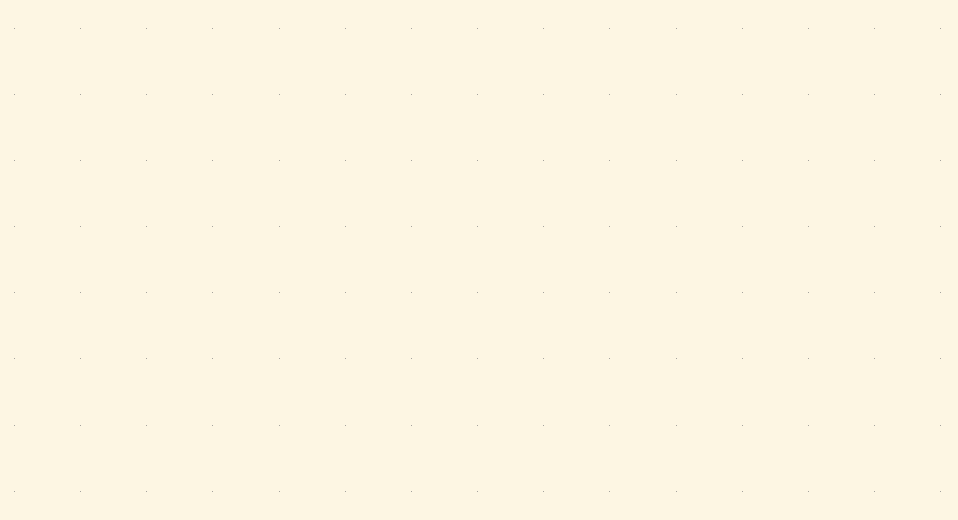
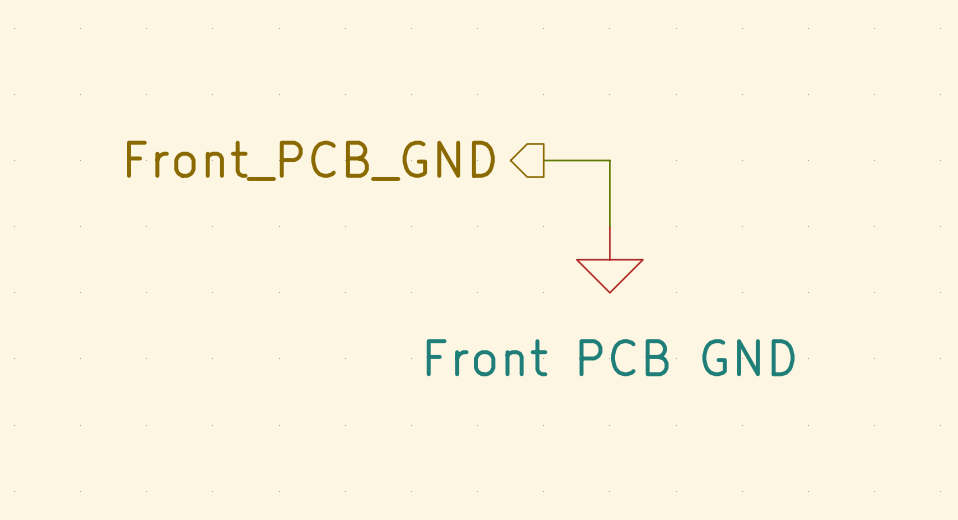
hierarchical label: none -> Front_PCB_GND (310, 160)
wire: none -> (543, 160) (609, 160) (609, 226)
power symbol: none -> Front PCB GND (609, 259)

